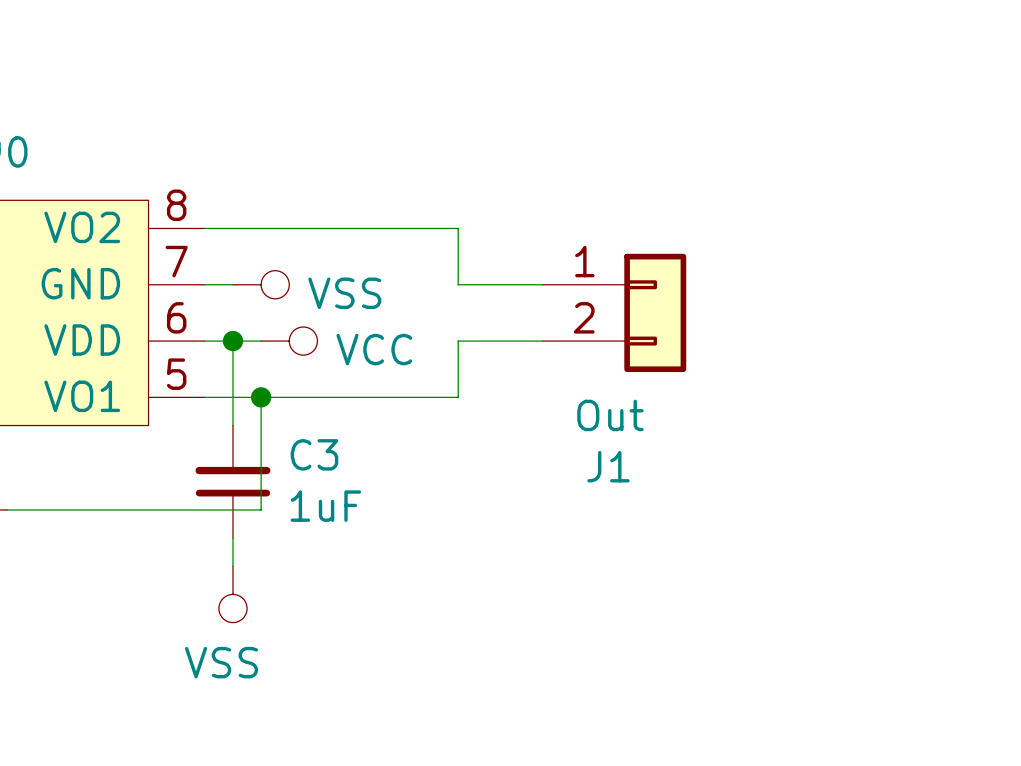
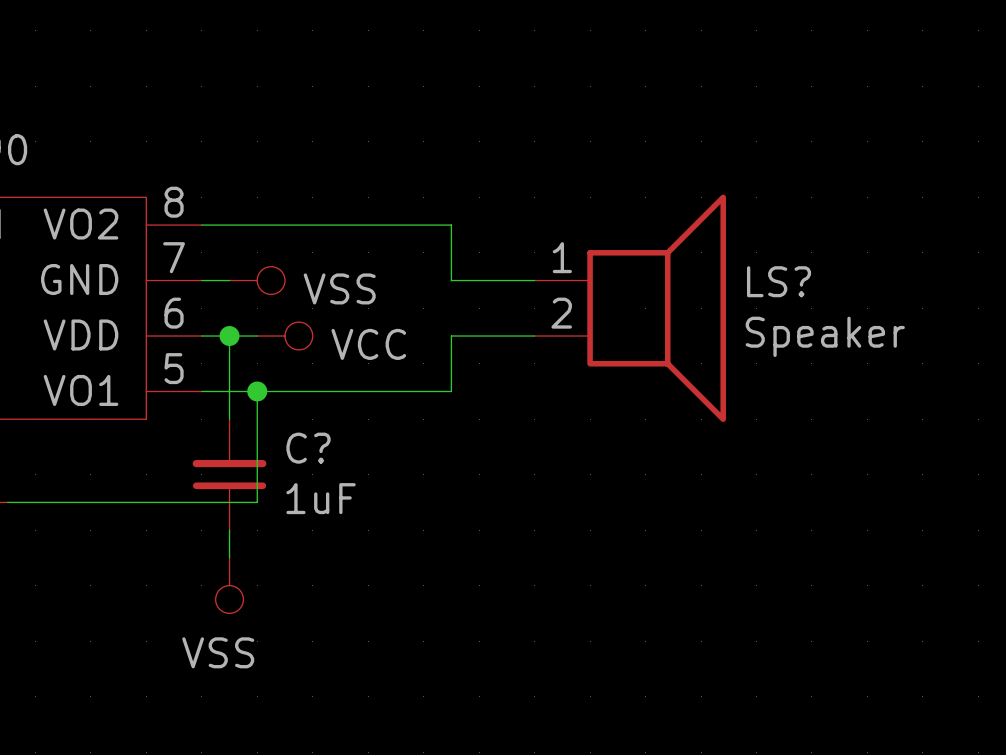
J1: Out (614, 312) -> none
LS?: none -> Speaker (630, 308)
C3 name: C3 (314, 454) -> C? (308, 448)

